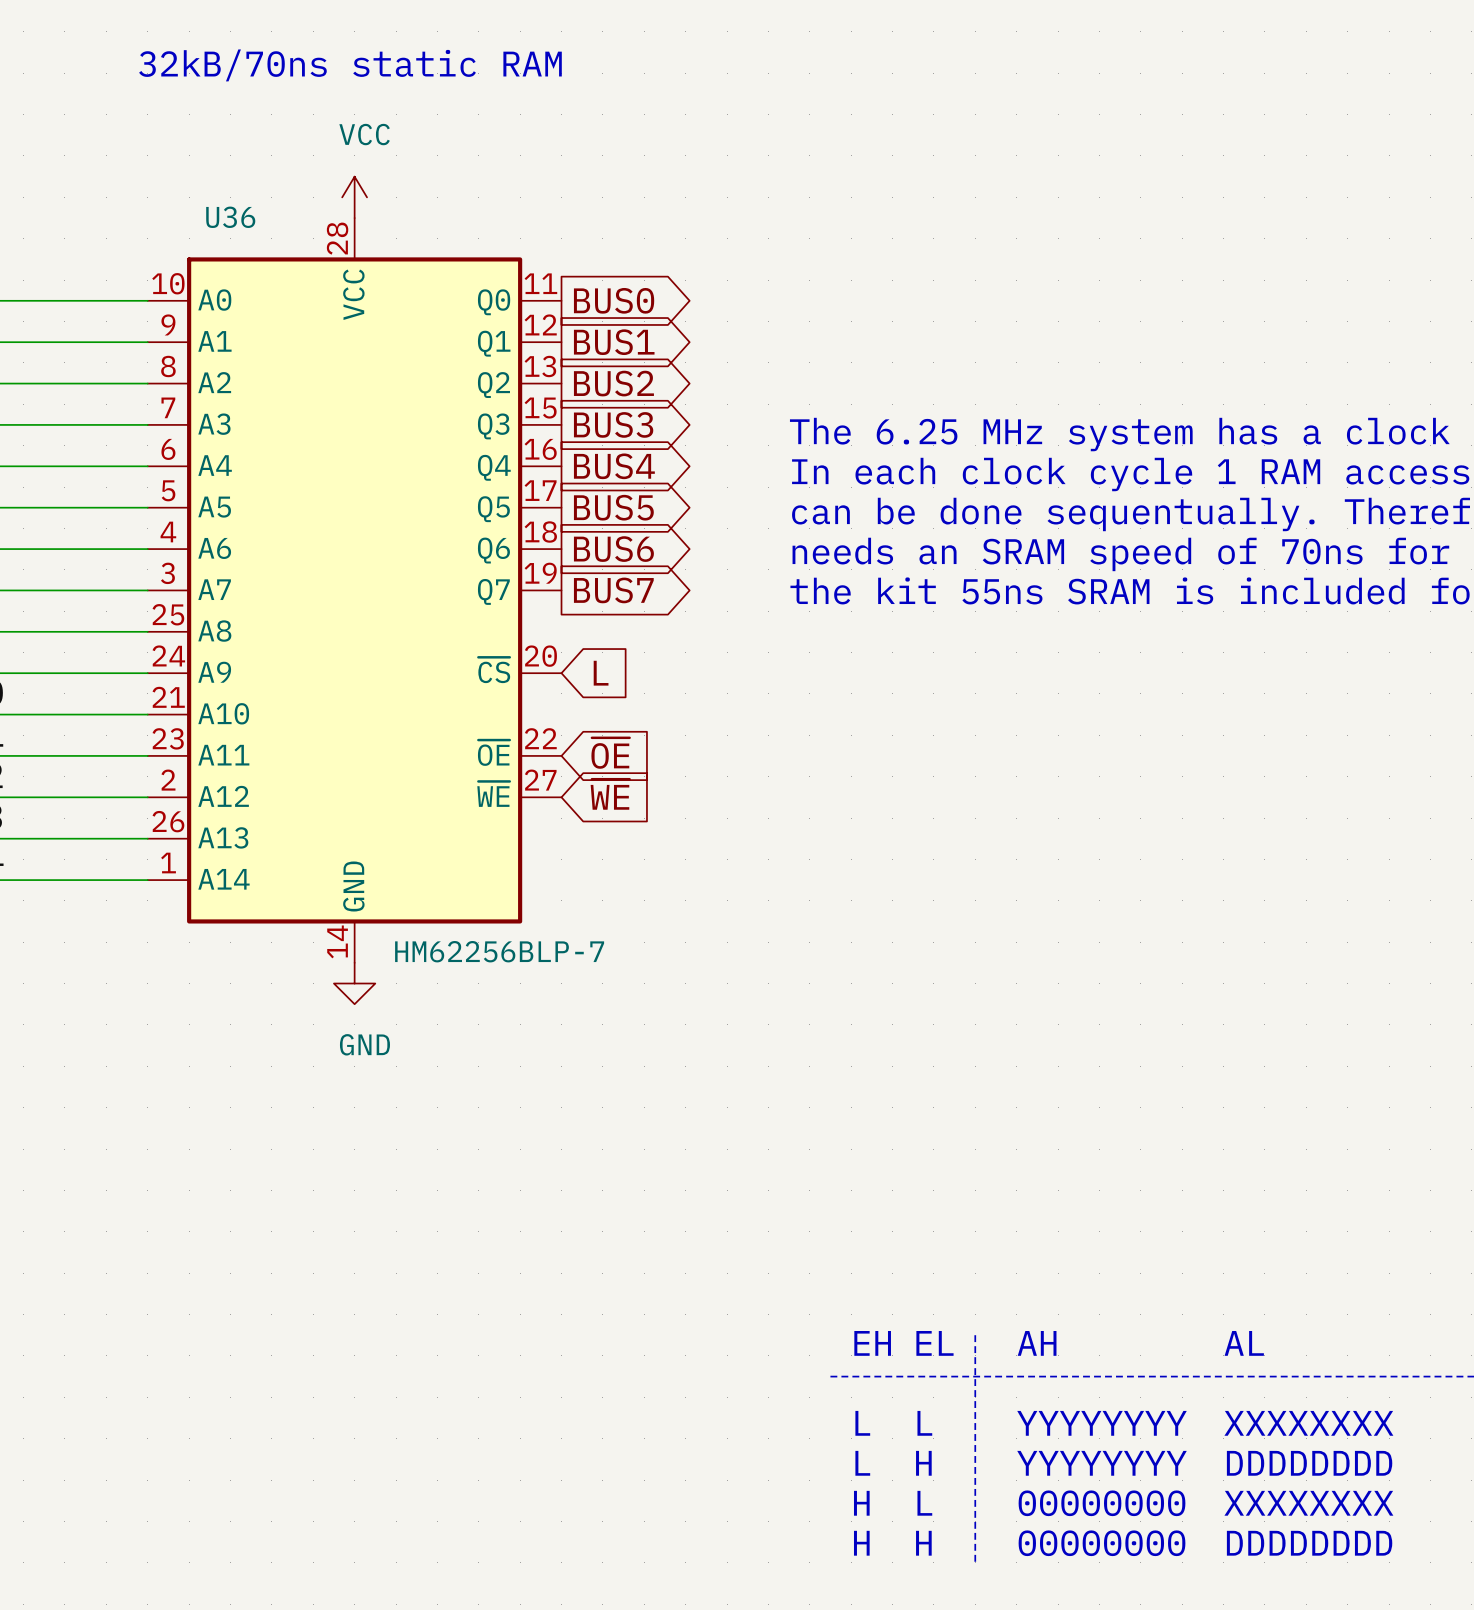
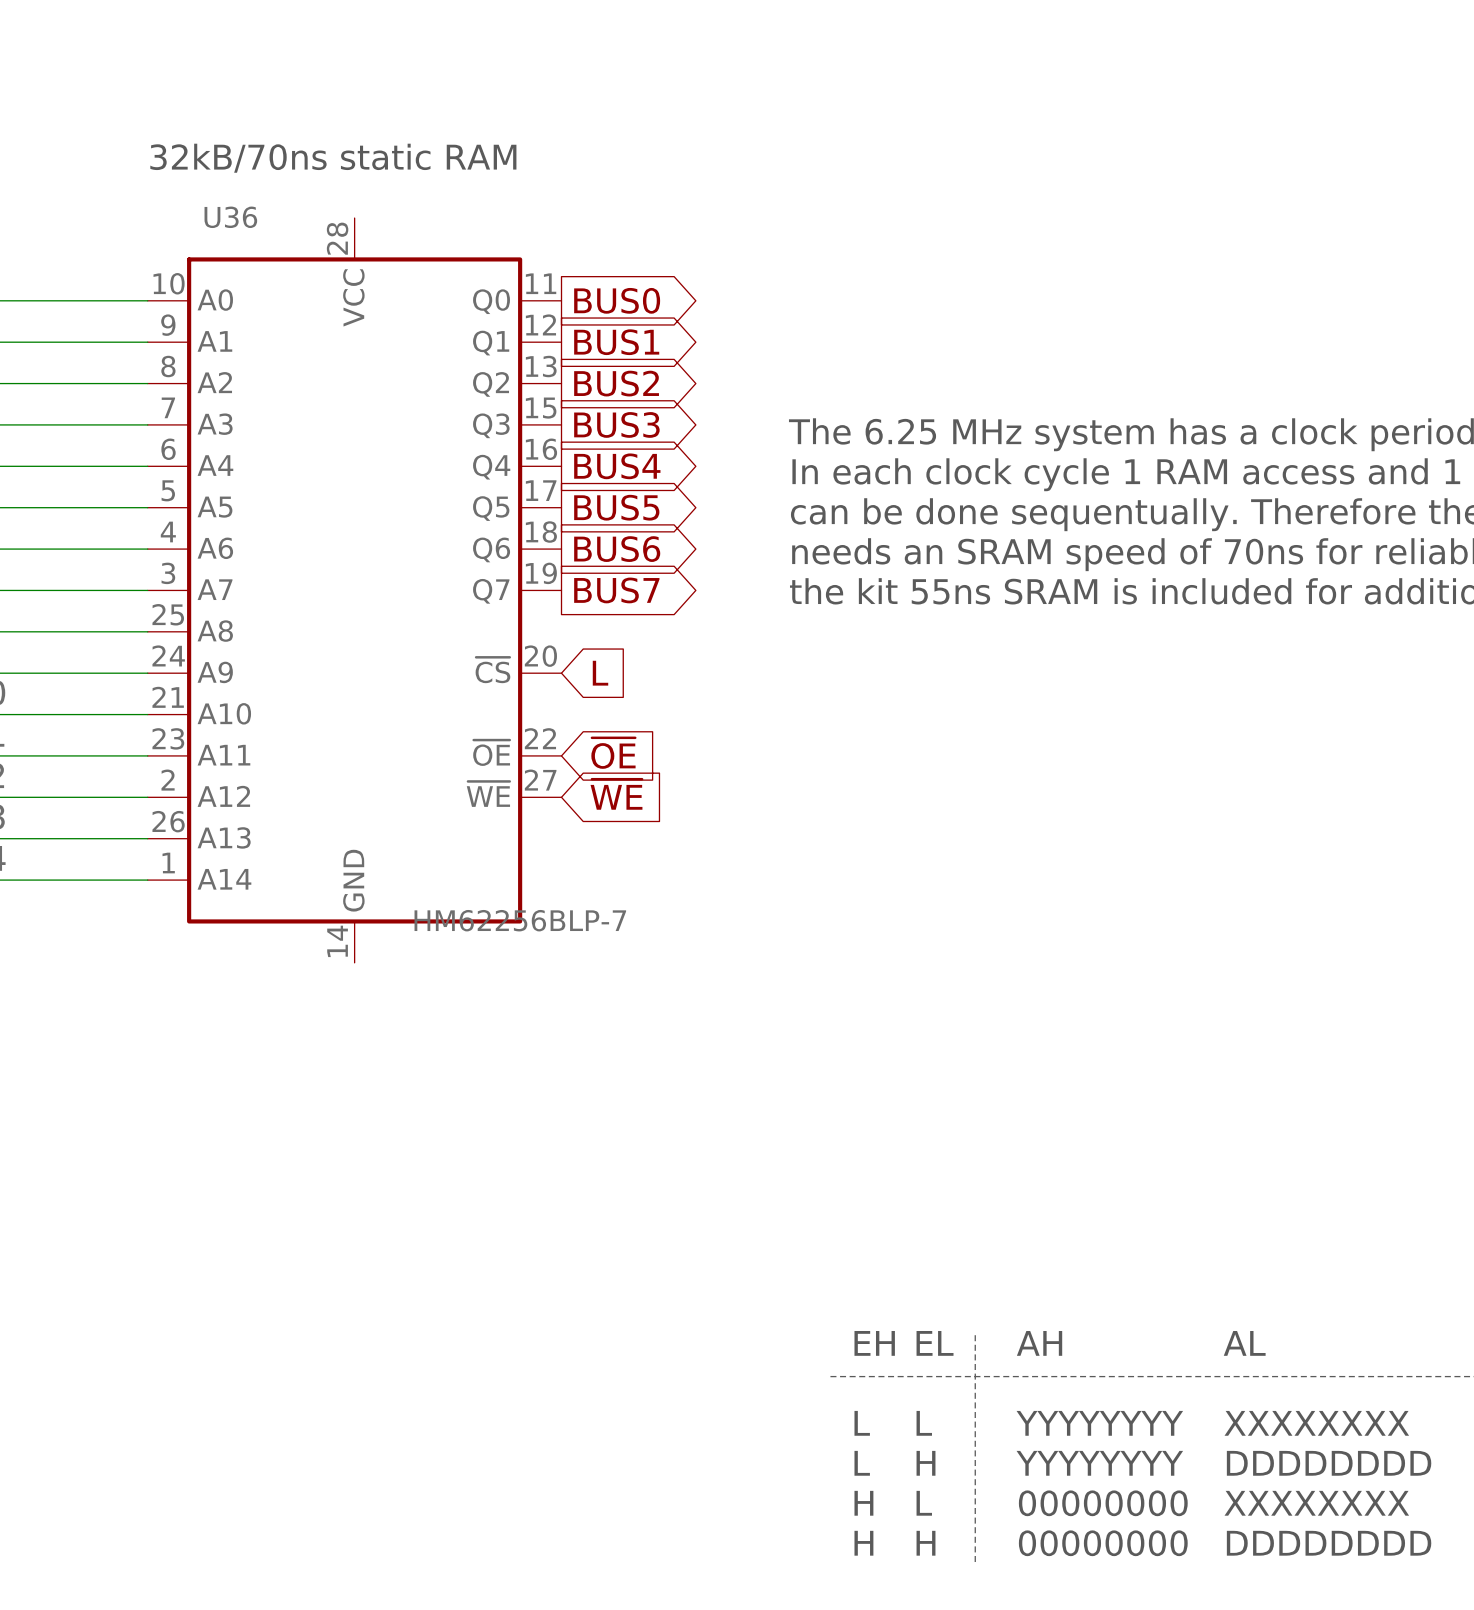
text position: 32kB/70ns static RAM (350, 65) -> 32kB/70ns static RAM (333, 158)
power symbol: VCC (354, 197) -> none
U36 value position: HM62256BLP-7 (499, 951) -> HM62256BLP-7 (520, 920)
power symbol: GND (354, 983) -> none

